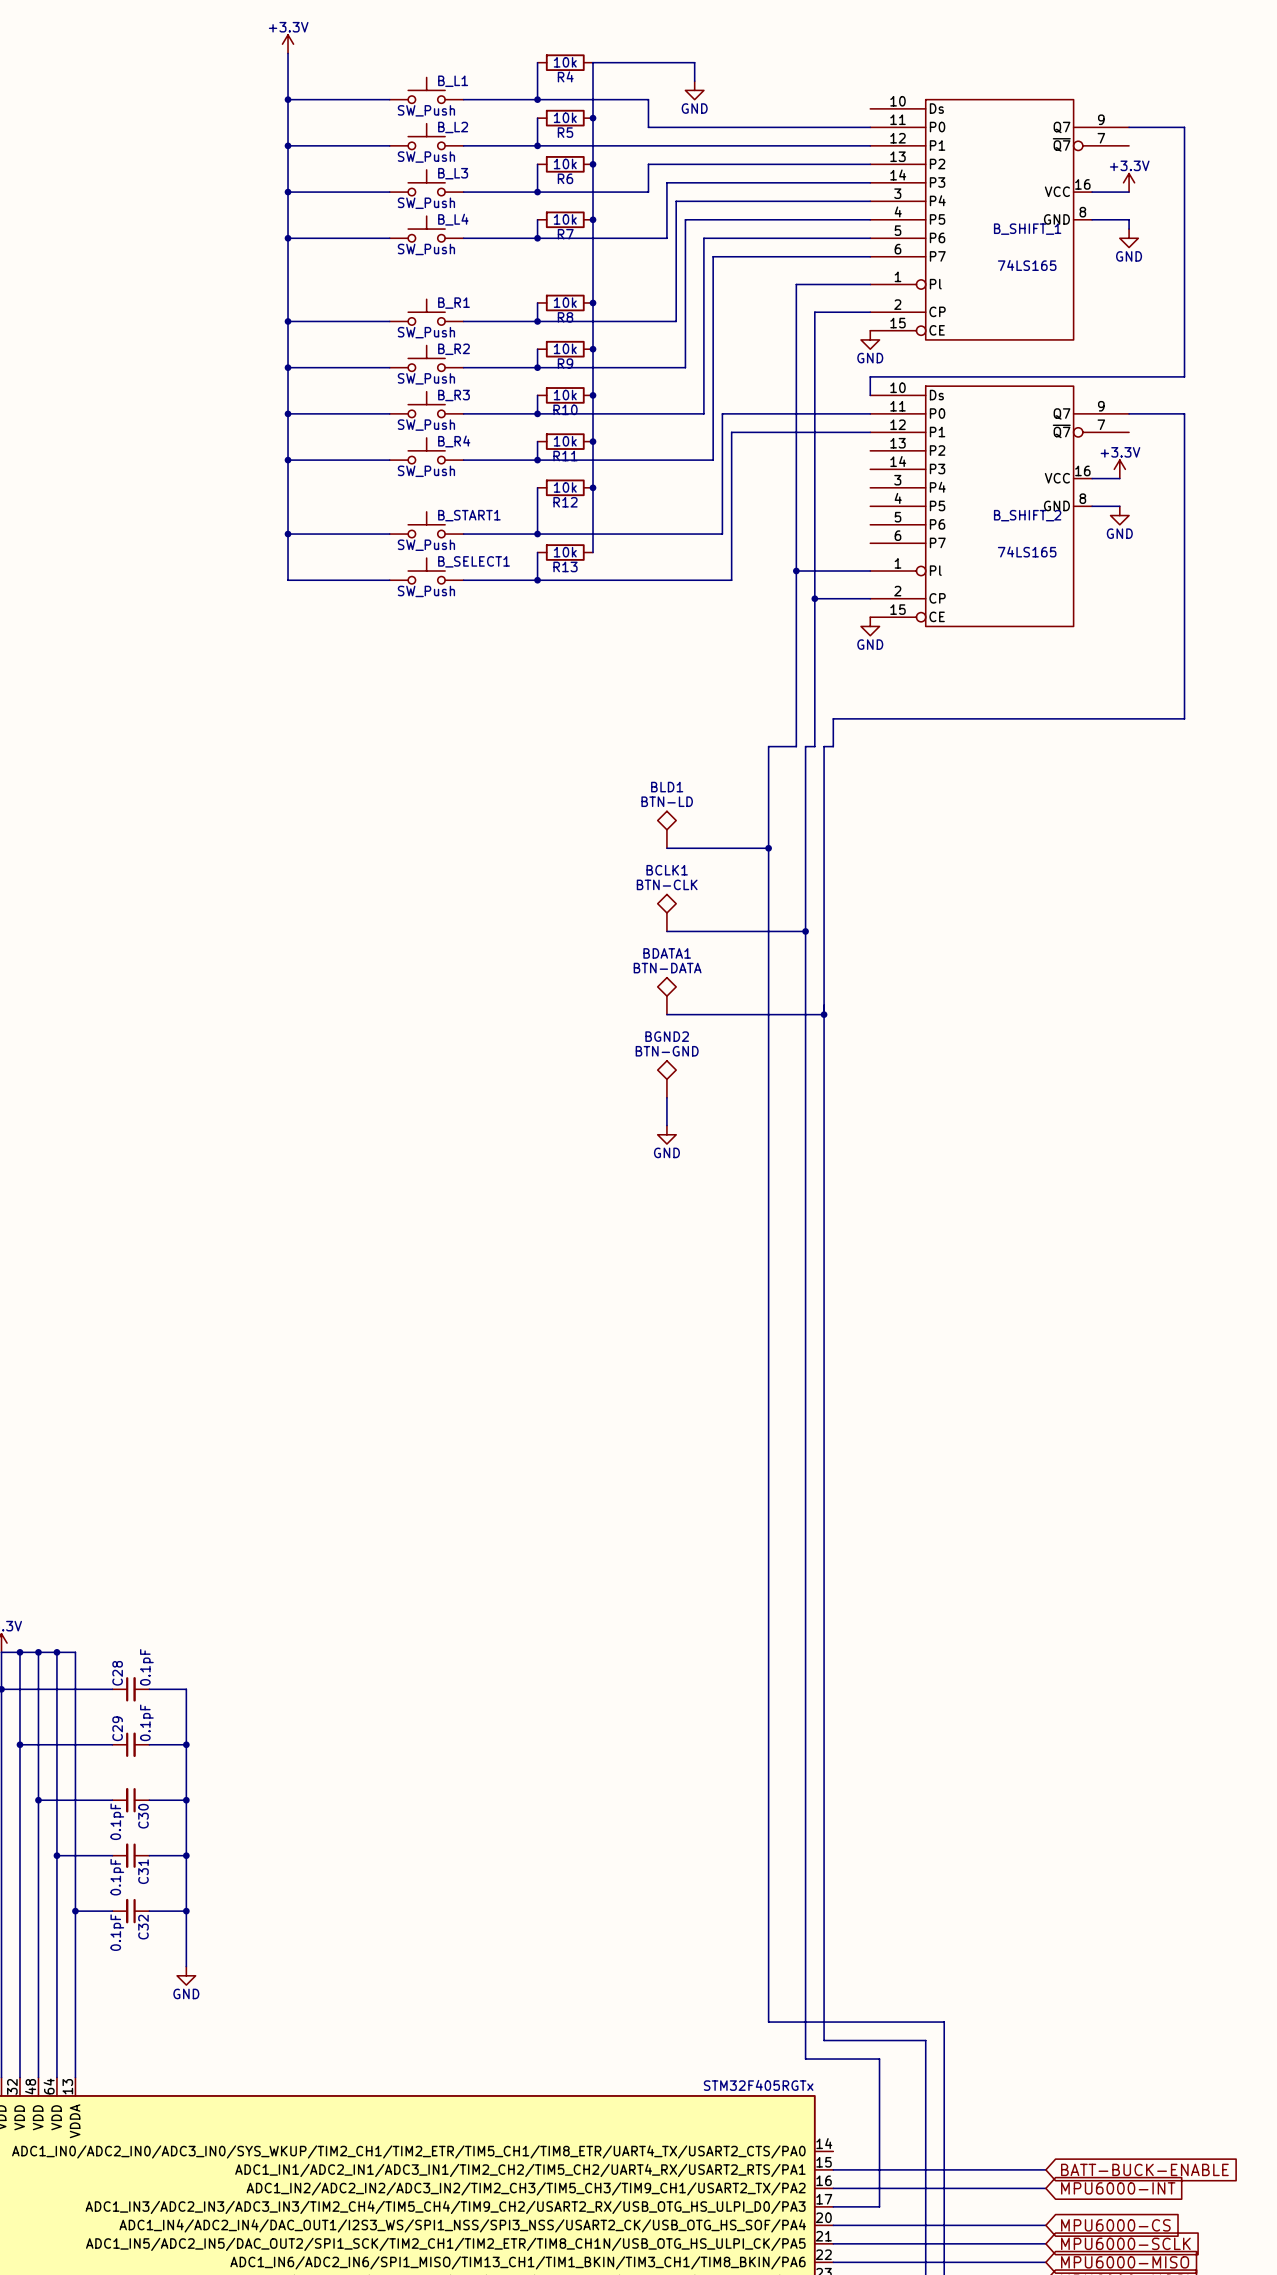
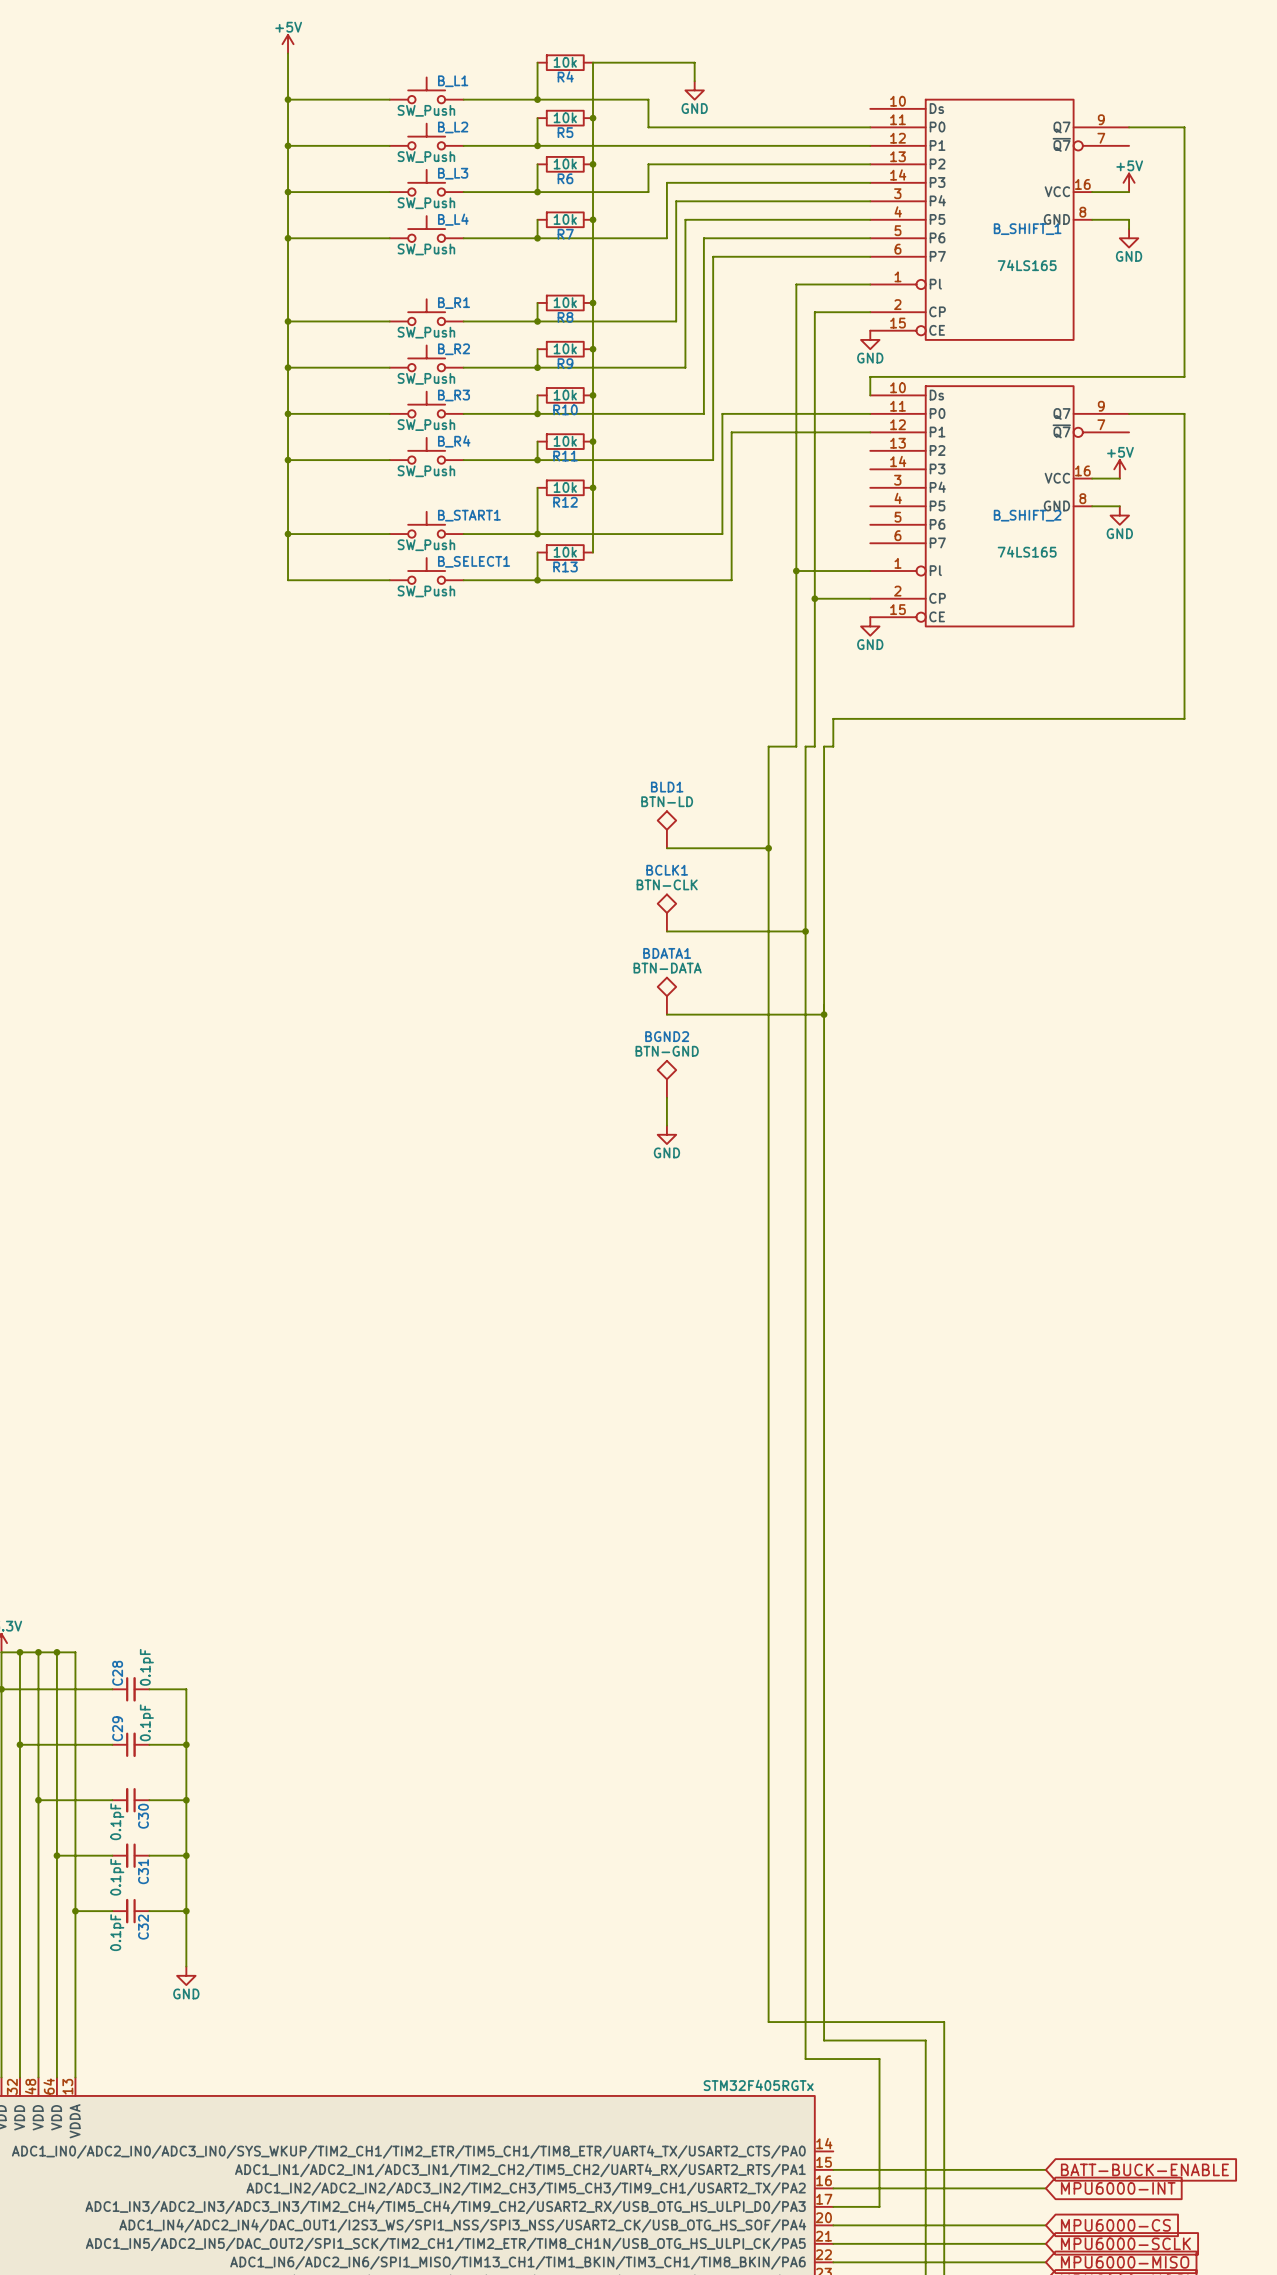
power symbol: +3.3V (288, 44) -> +5V (288, 44)
power symbol: +3.3V (1129, 182) -> +5V (1129, 182)
power symbol: +3.3V (1119, 469) -> +5V (1119, 469)

